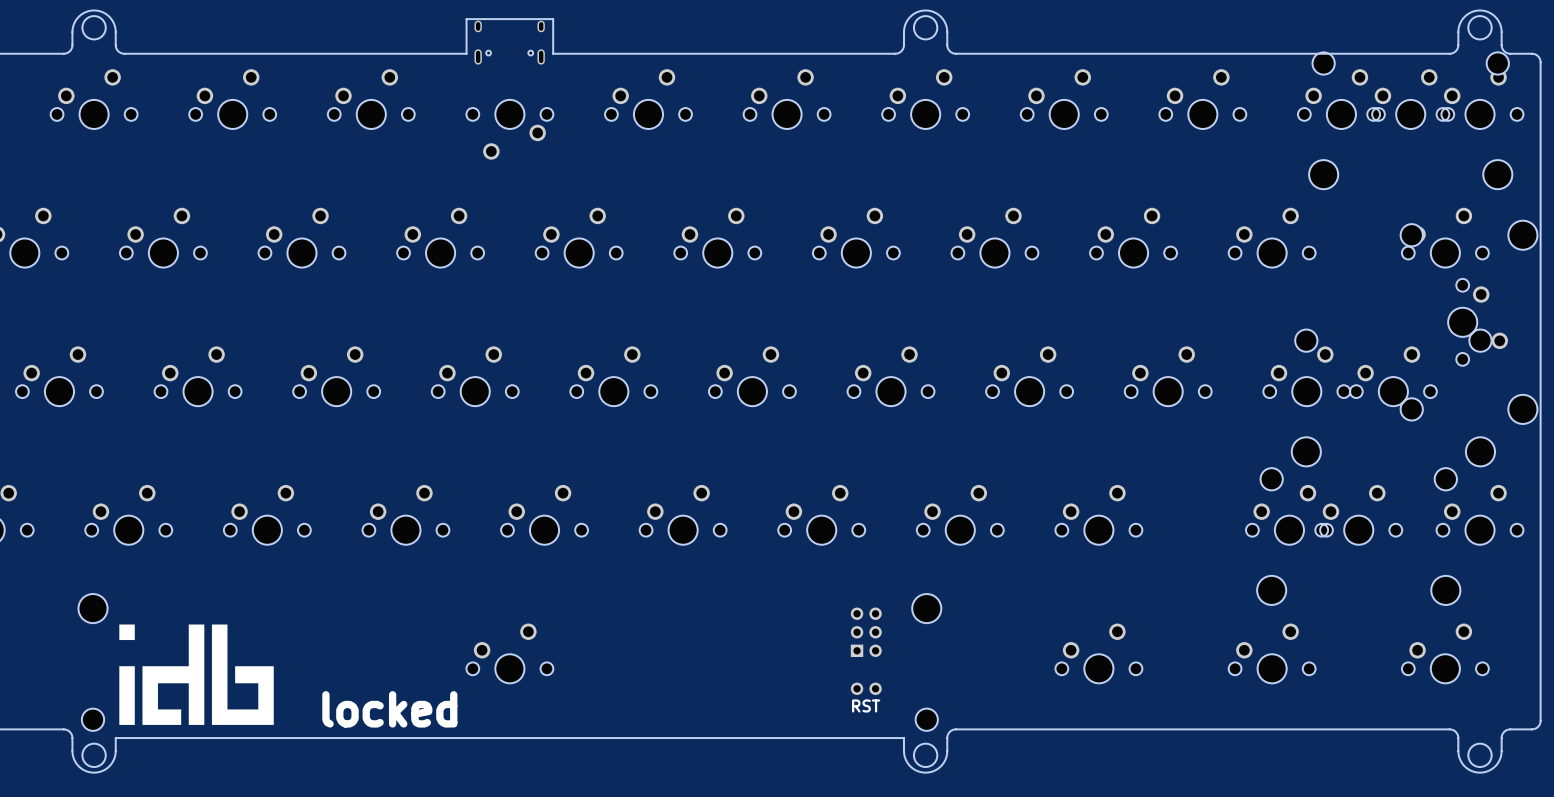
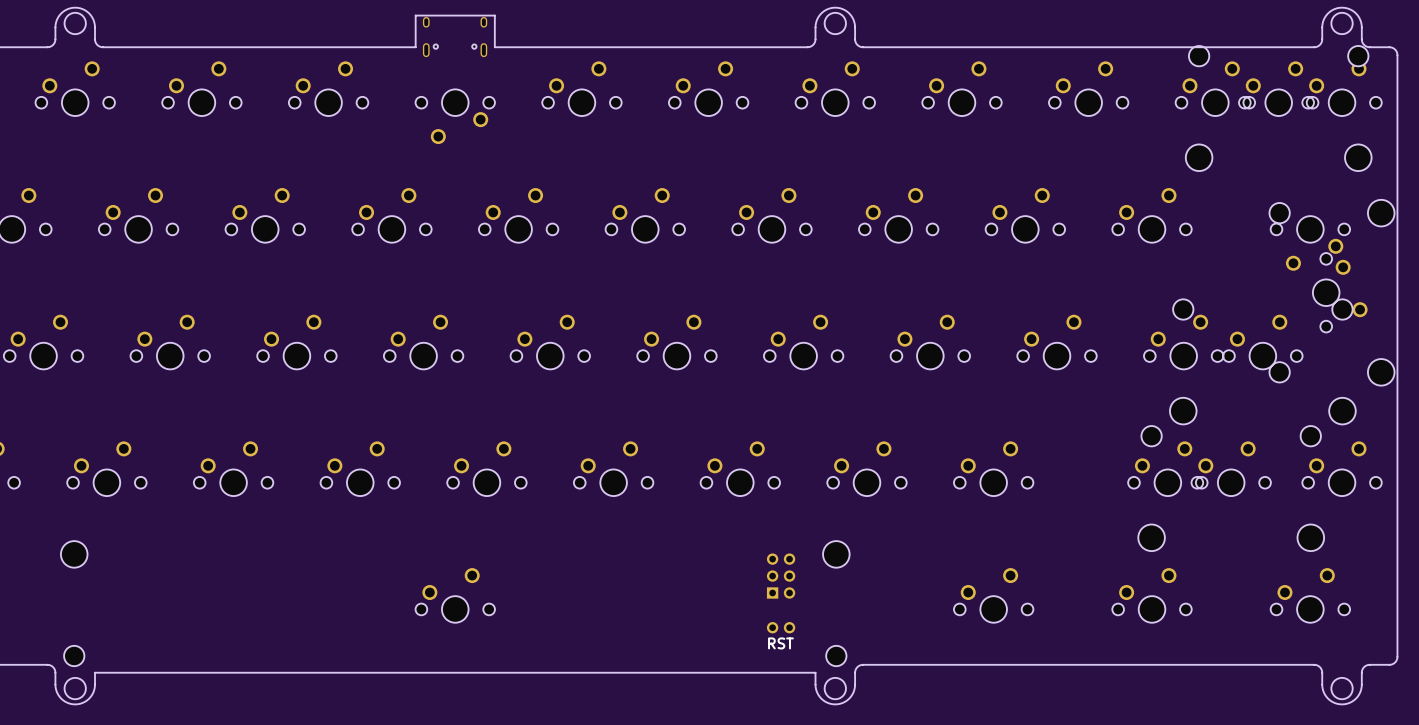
part rotation: 0° (1445, 237) -> 180° (1310, 243)
drawing: [119, 624, 274, 725] -> none

